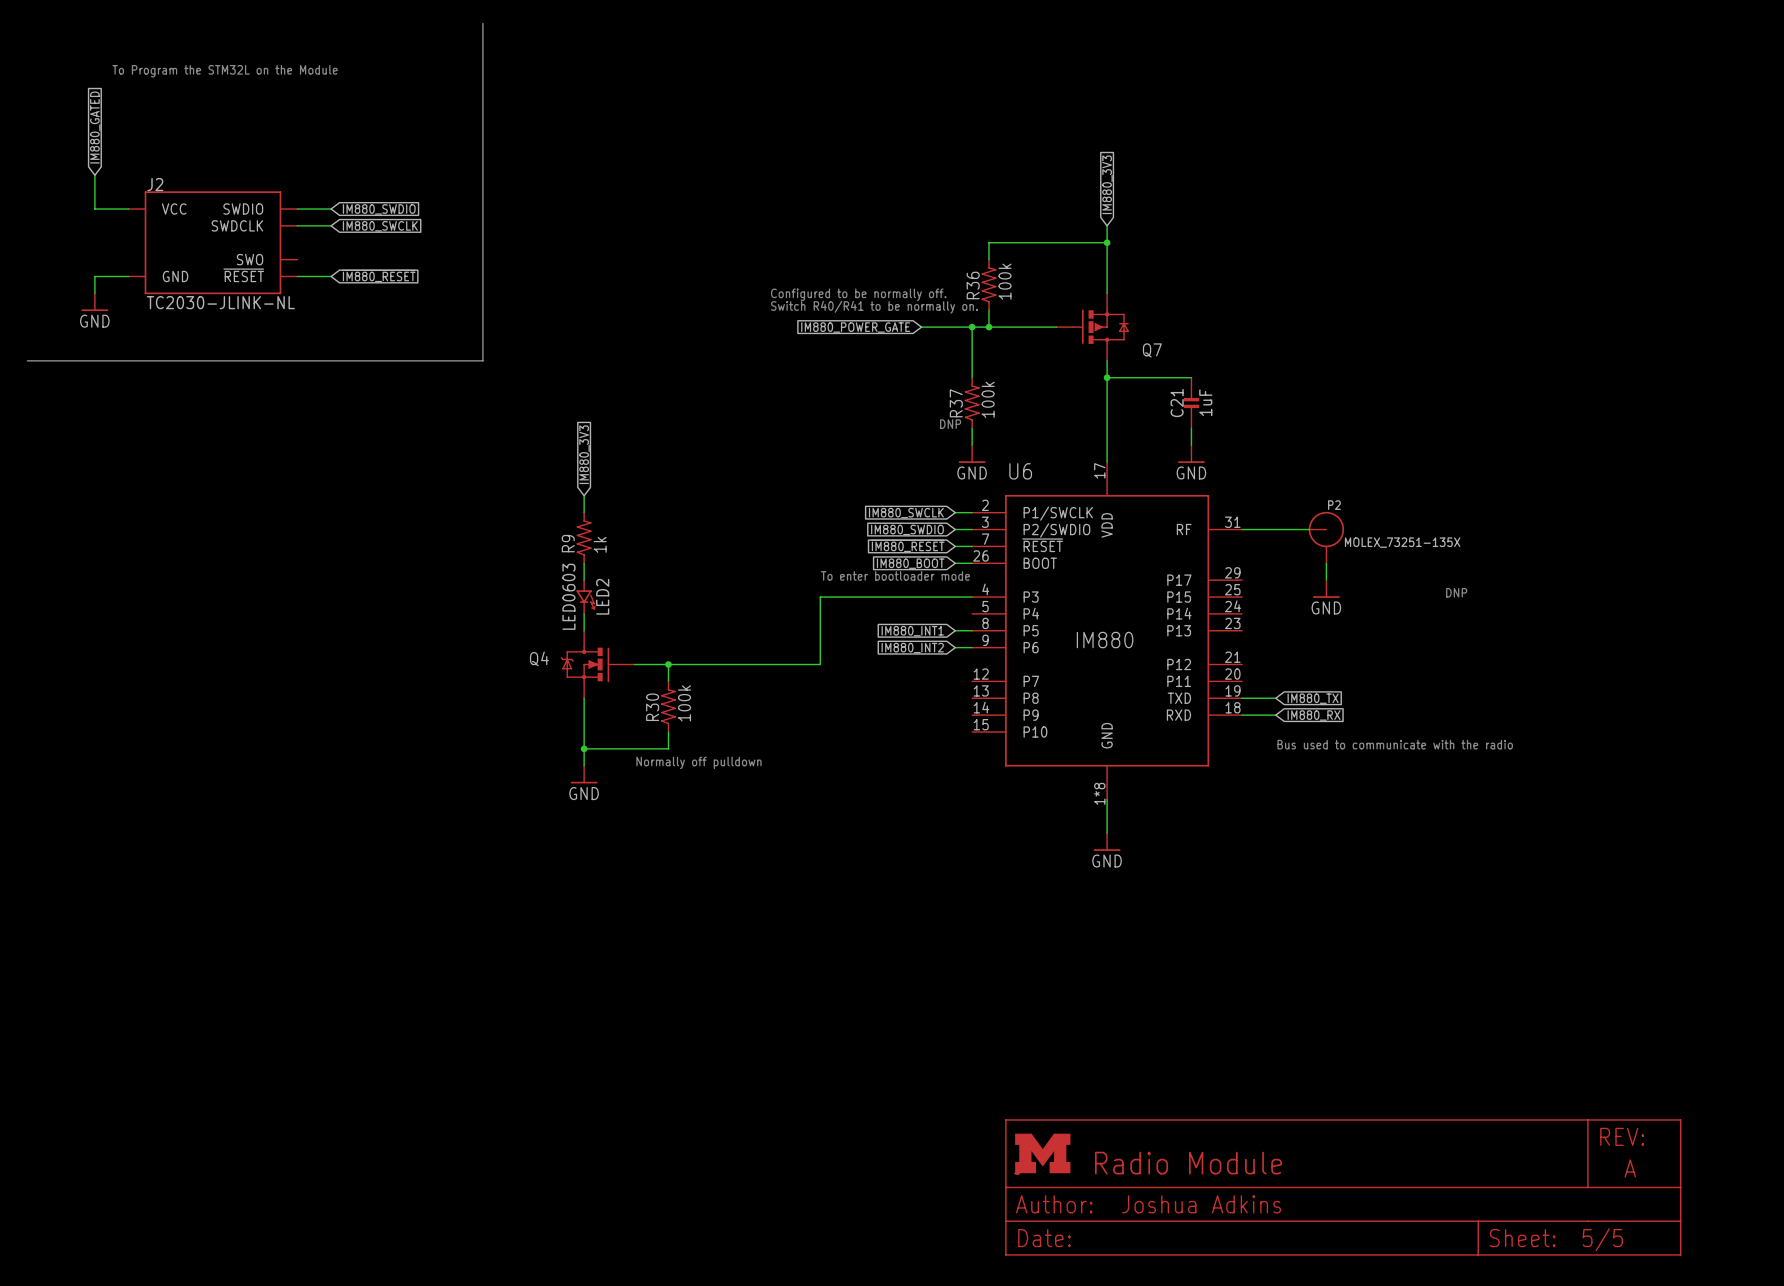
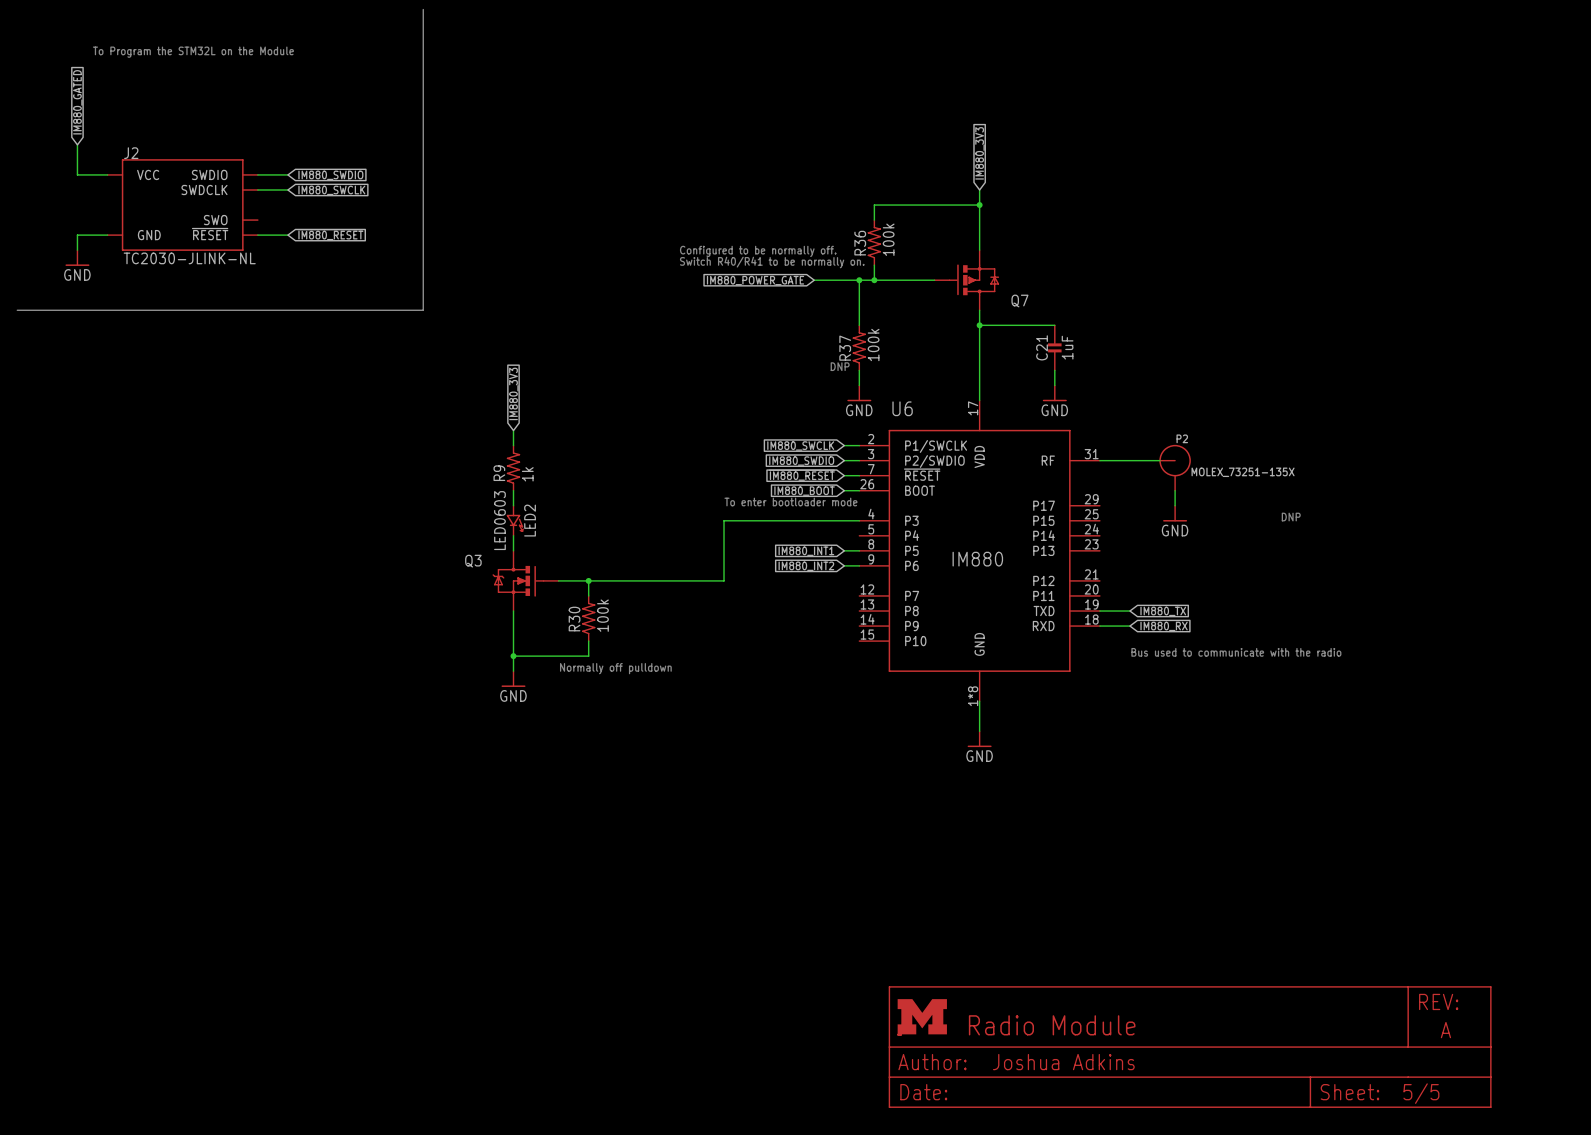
Q4 name: Q4 (539, 658) -> Q3 (473, 561)

